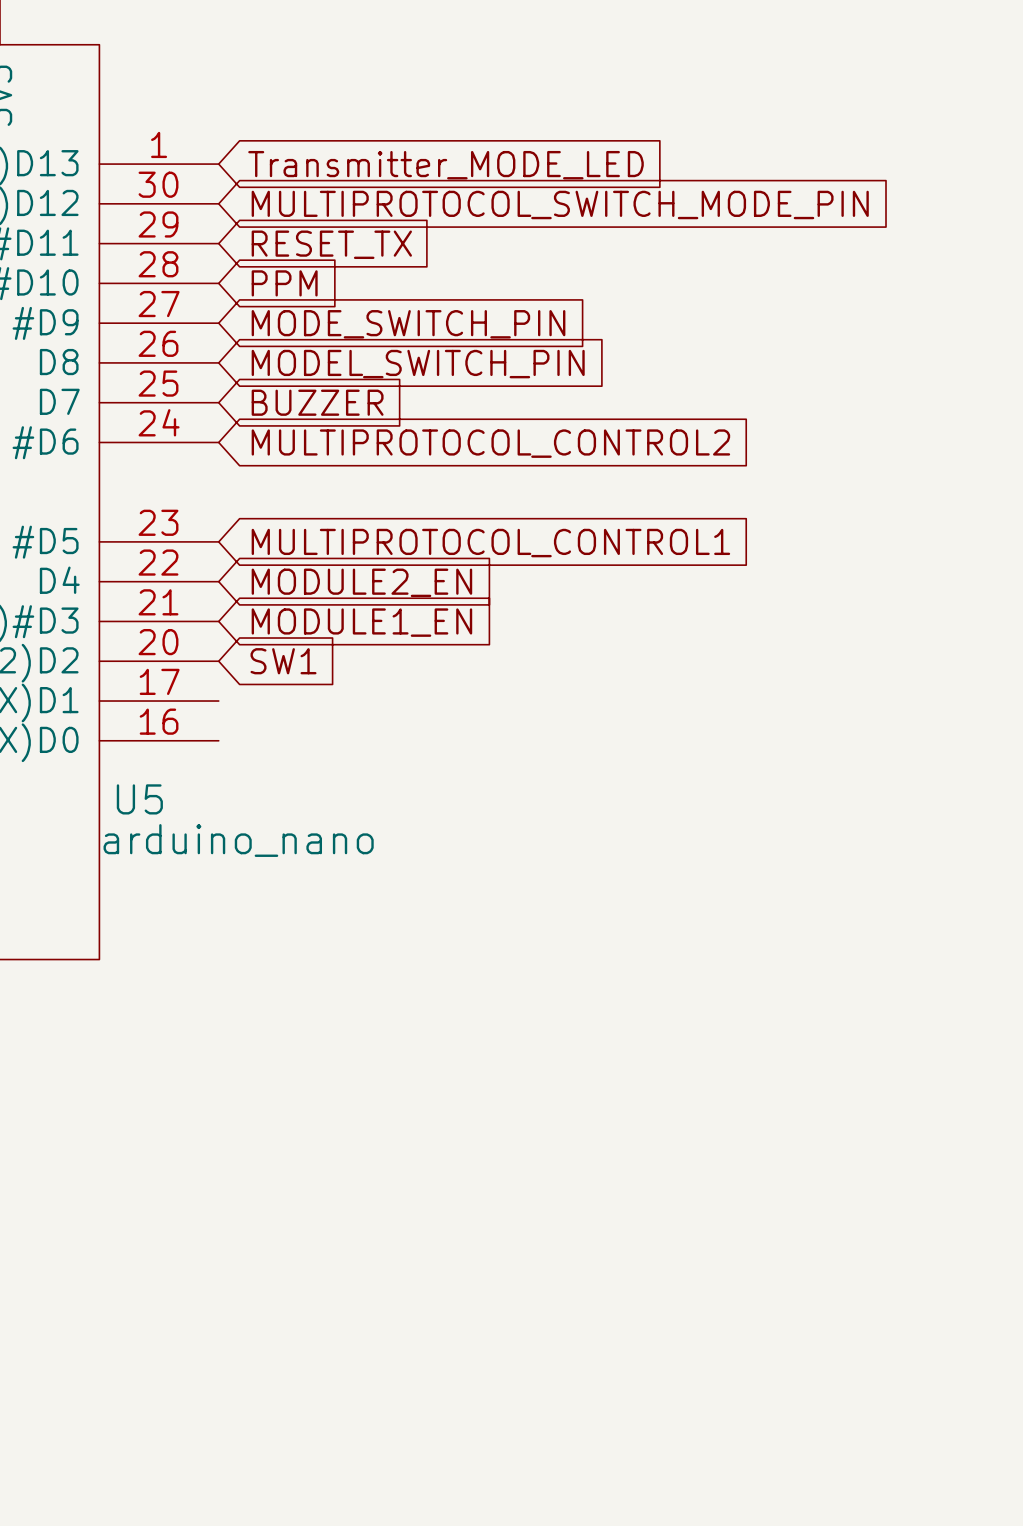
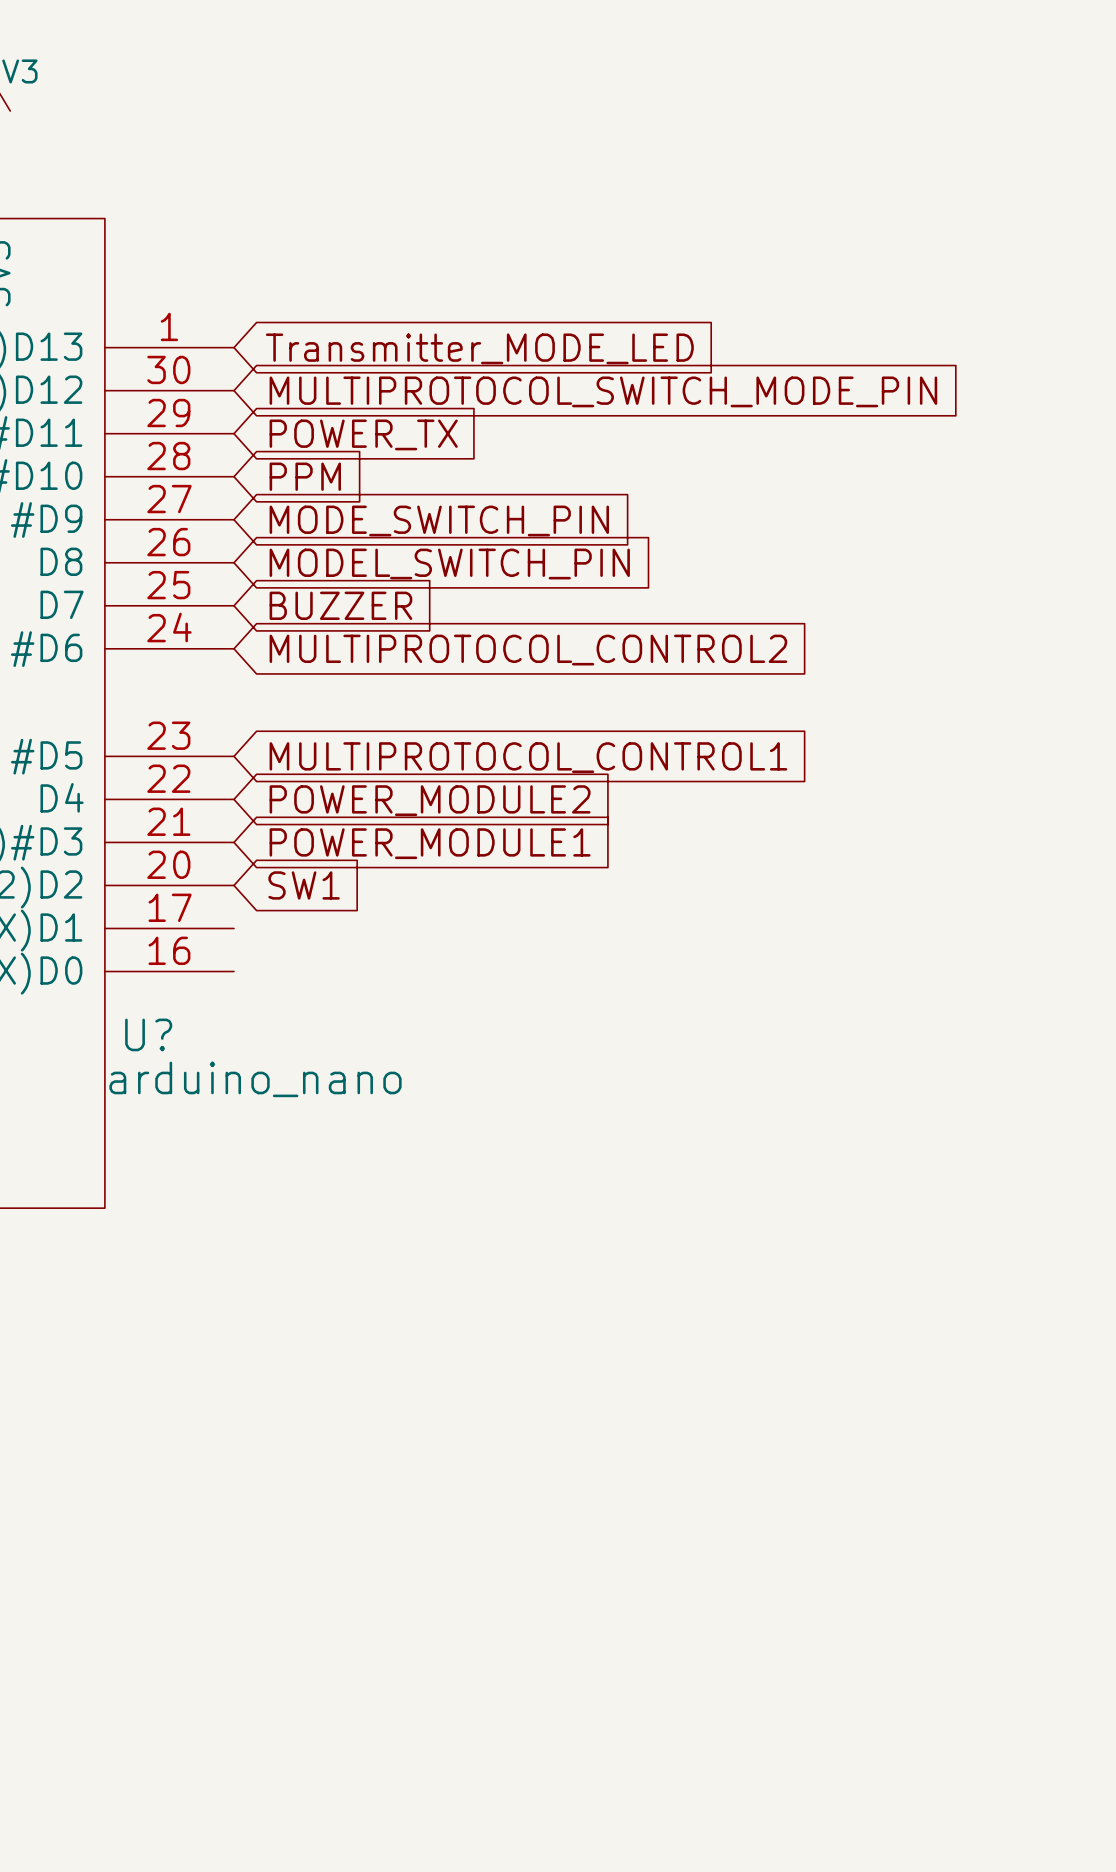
global label: RESET_TX (331, 244) -> POWER_TX (363, 434)
global label: MODULE2_EN (361, 582) -> POWER_MODULE2 (430, 800)
global label: MODULE1_EN (361, 622) -> POWER_MODULE1 (430, 843)
U5 name: U5 (139, 799) -> U? (148, 1034)

